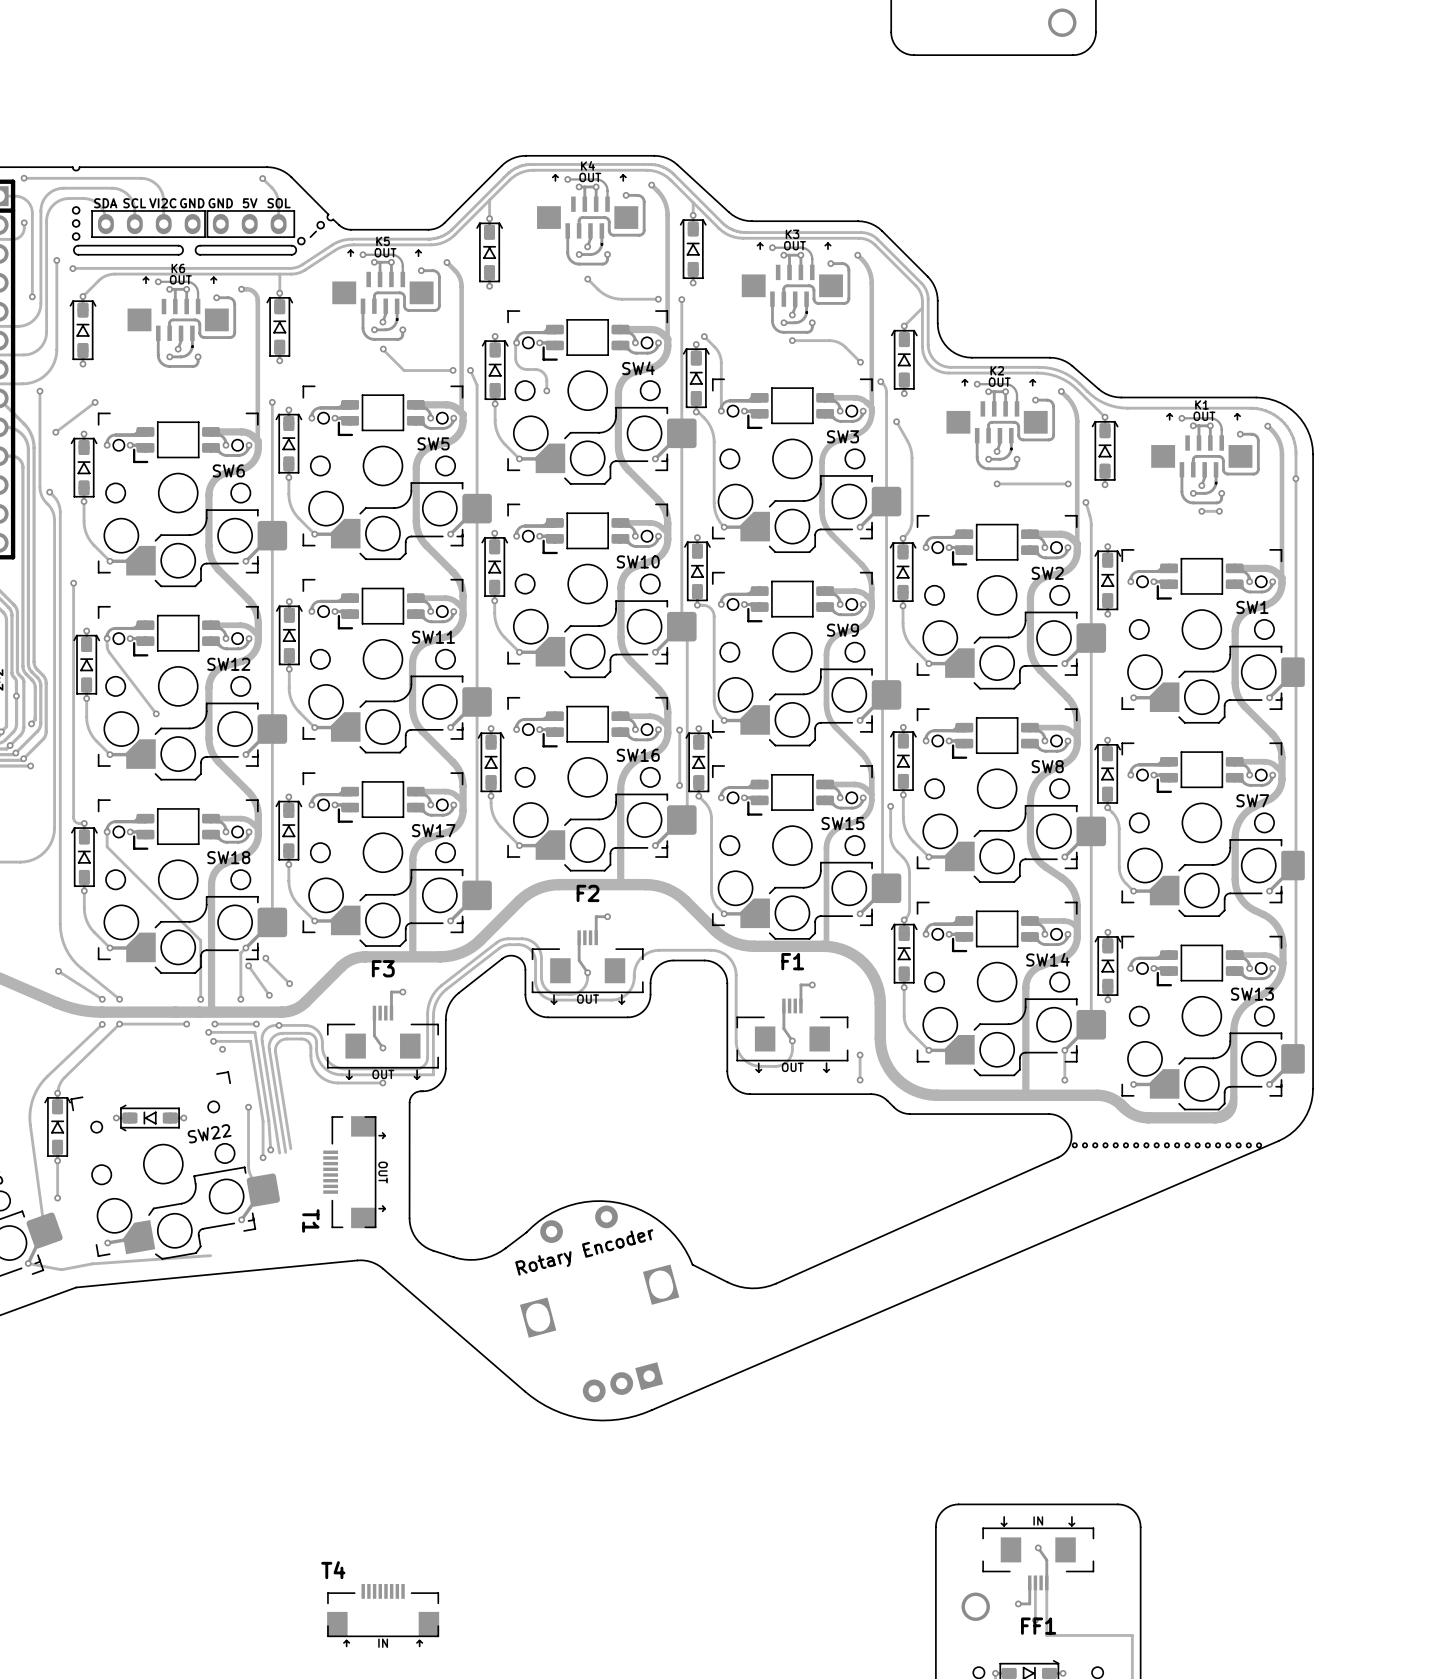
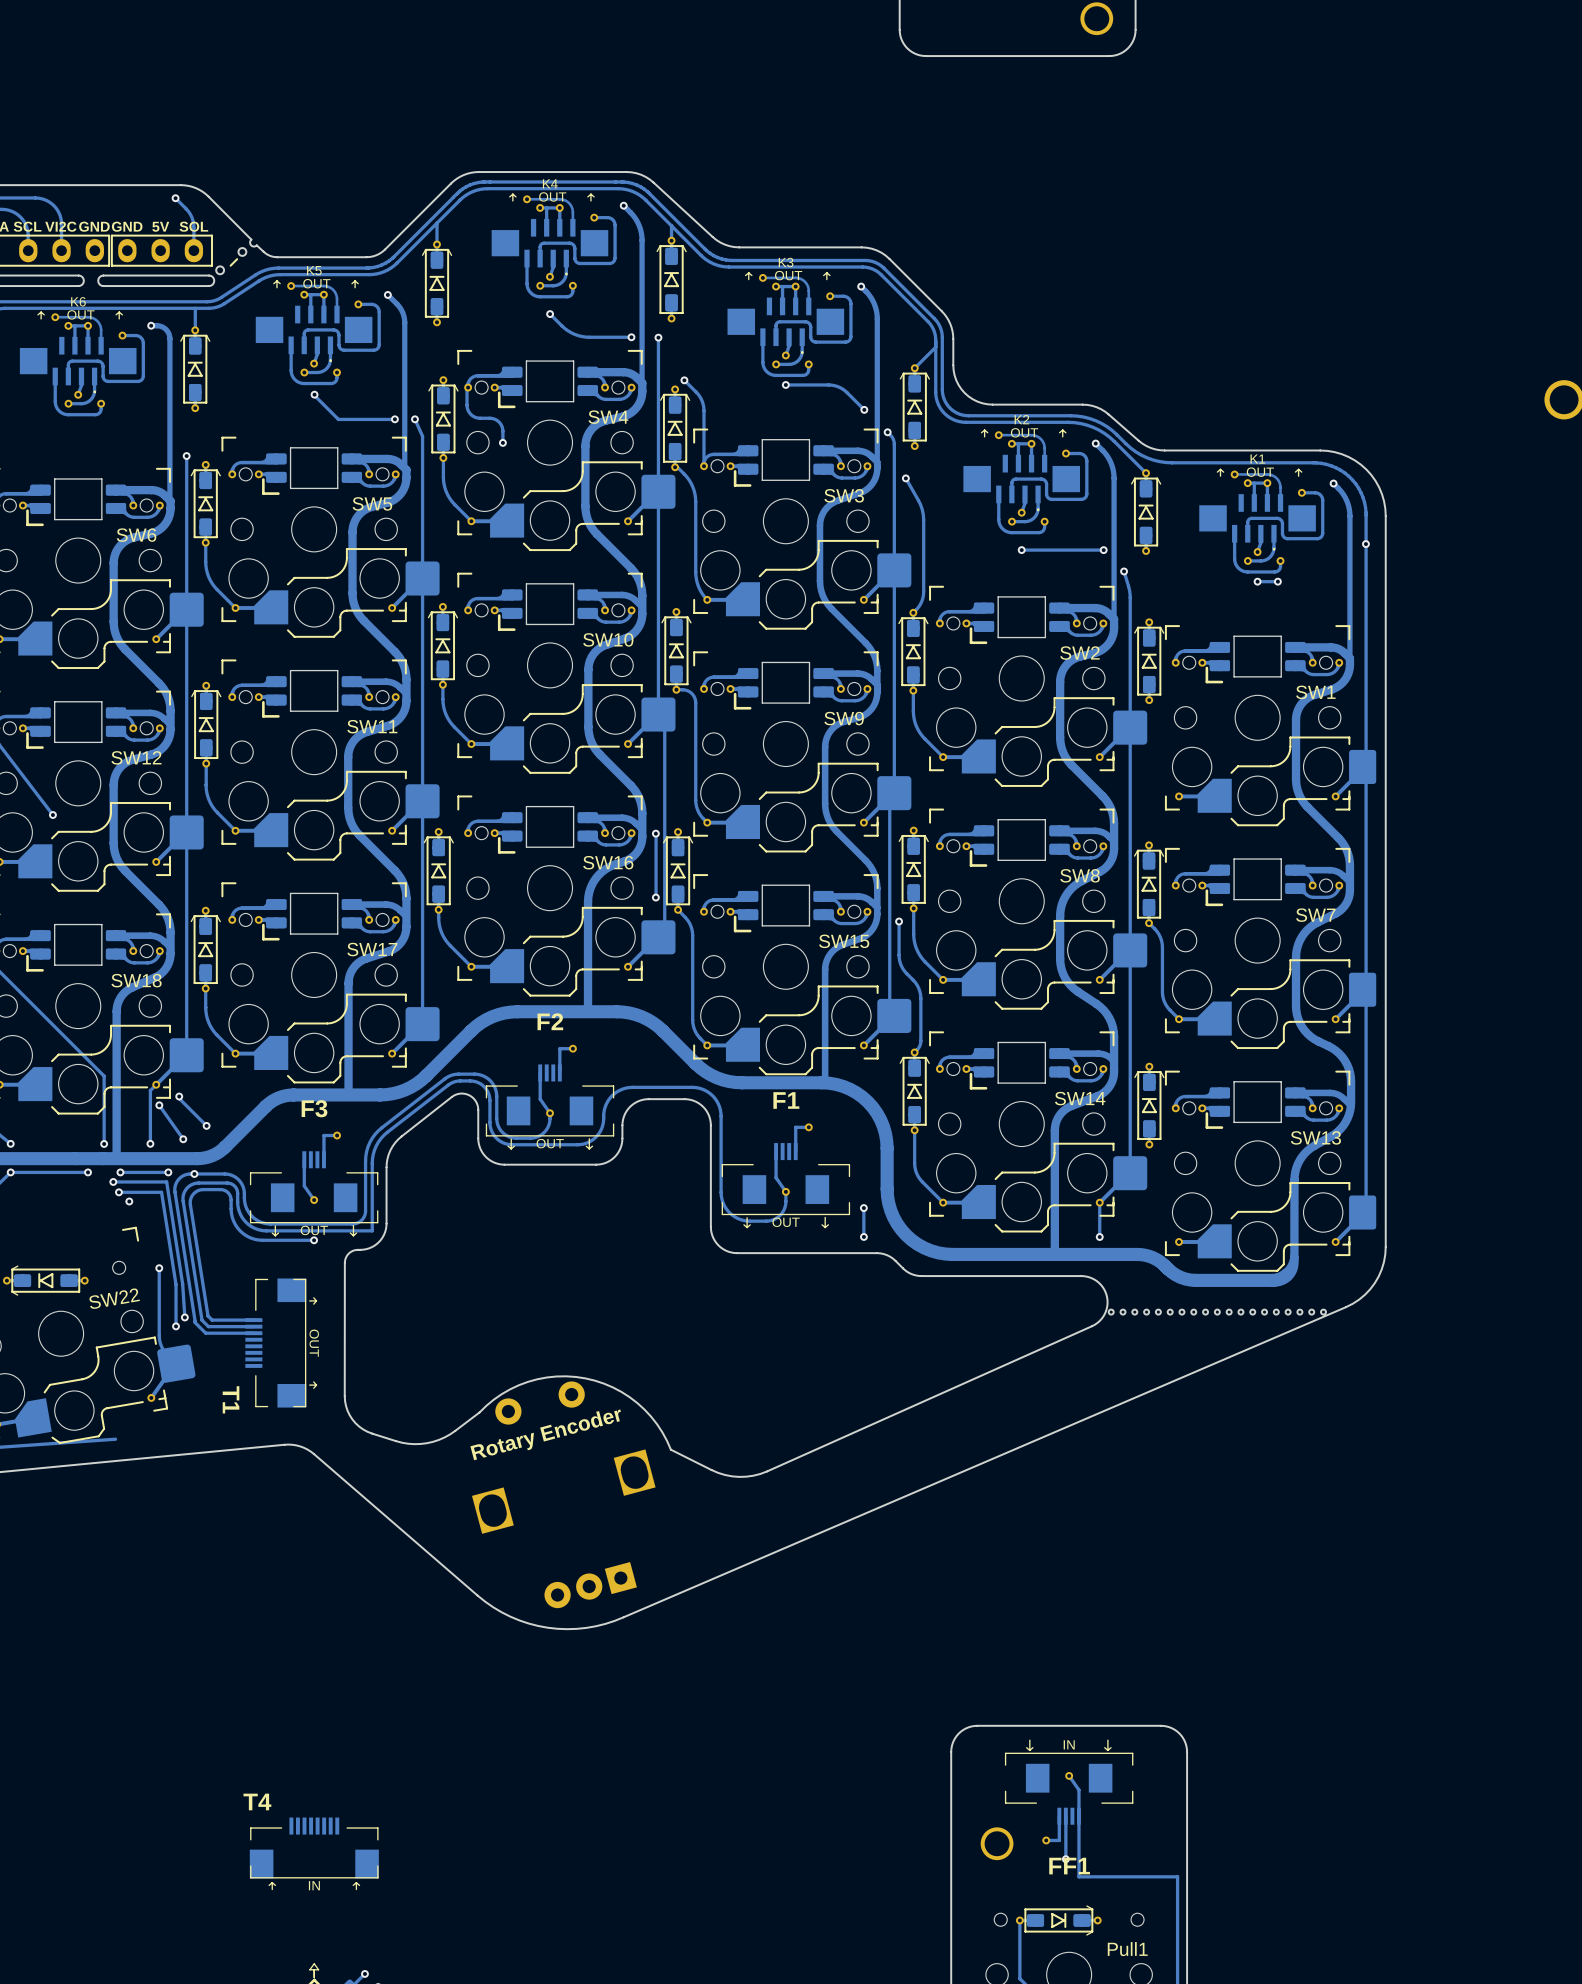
track: none -> (208, 1315) (212, 1320) (253, 1320)
track: none -> (202, 1320) (208, 1326) (253, 1326)
track: none -> (195, 1321) (205, 1333) (253, 1333)

